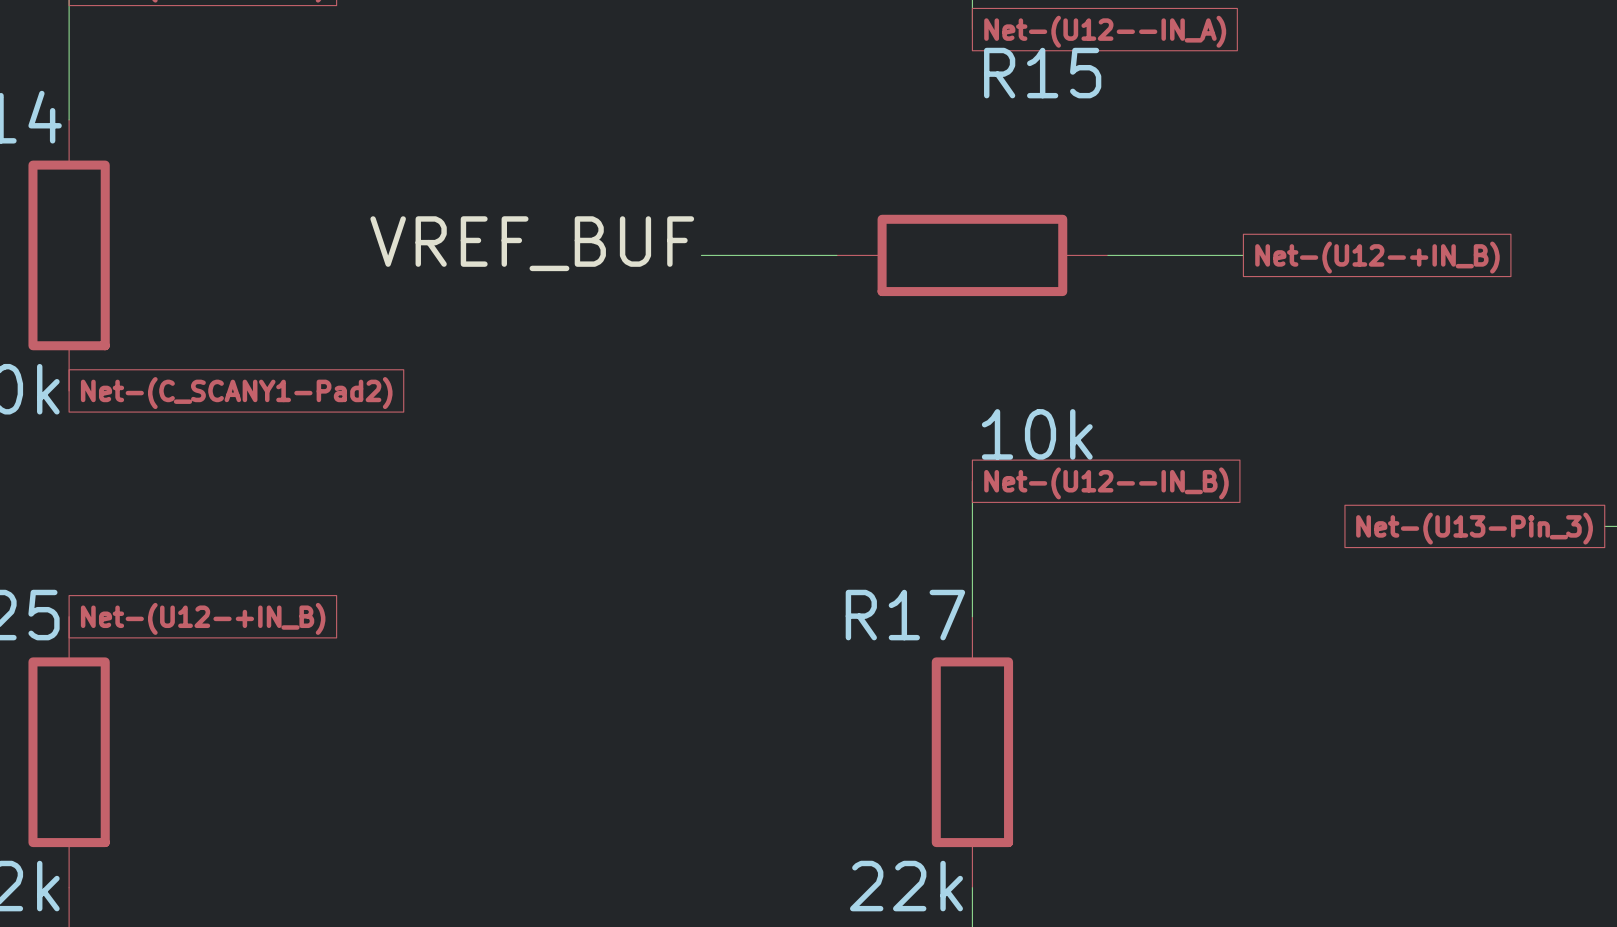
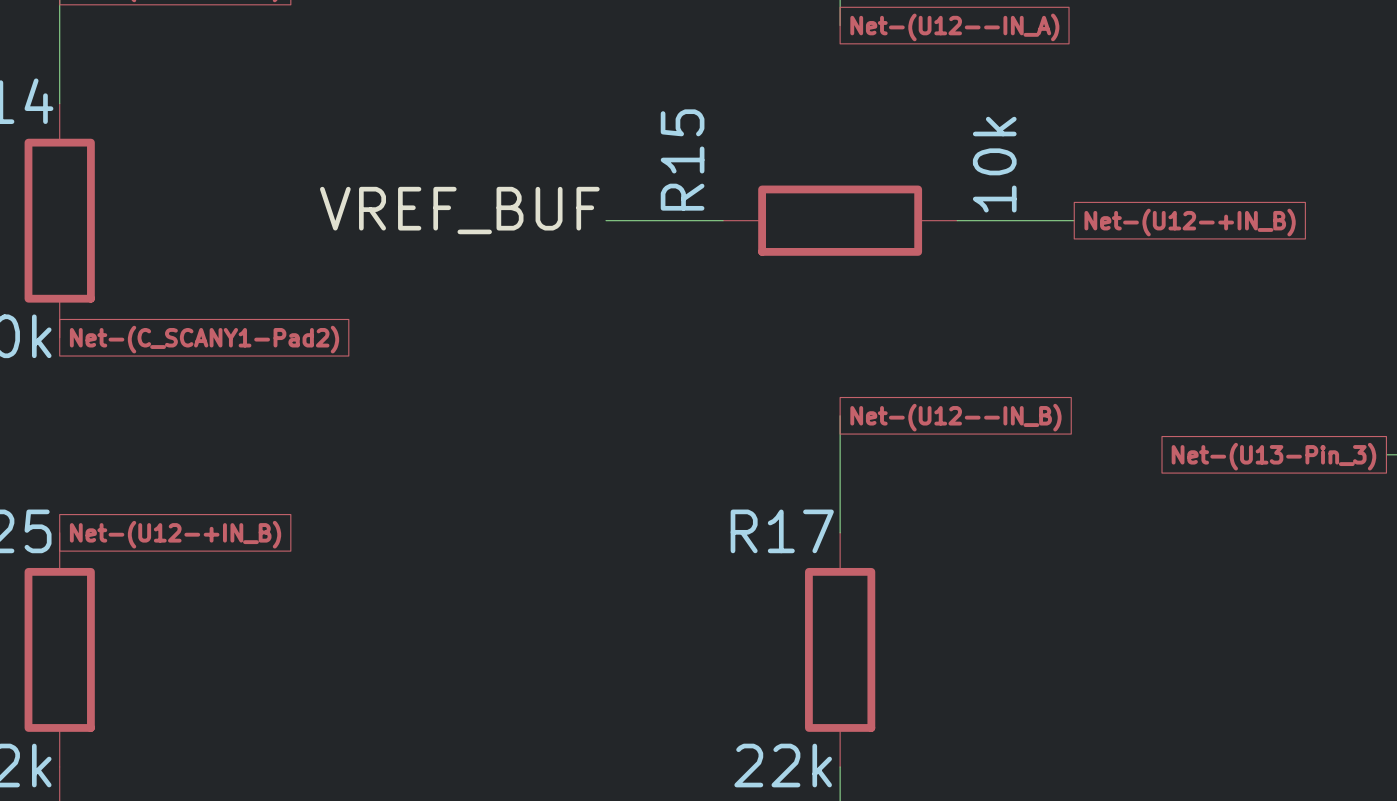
R15 name rotation: 0° (1042, 73) -> 90° counterclockwise (682, 159)
R15 name position: R15 (1042, 73) -> R15 (682, 159)
R15 value rotation: 0° (1037, 434) -> 90° counterclockwise (994, 164)
R15 value position: 10k (1037, 434) -> 10k (994, 164)

